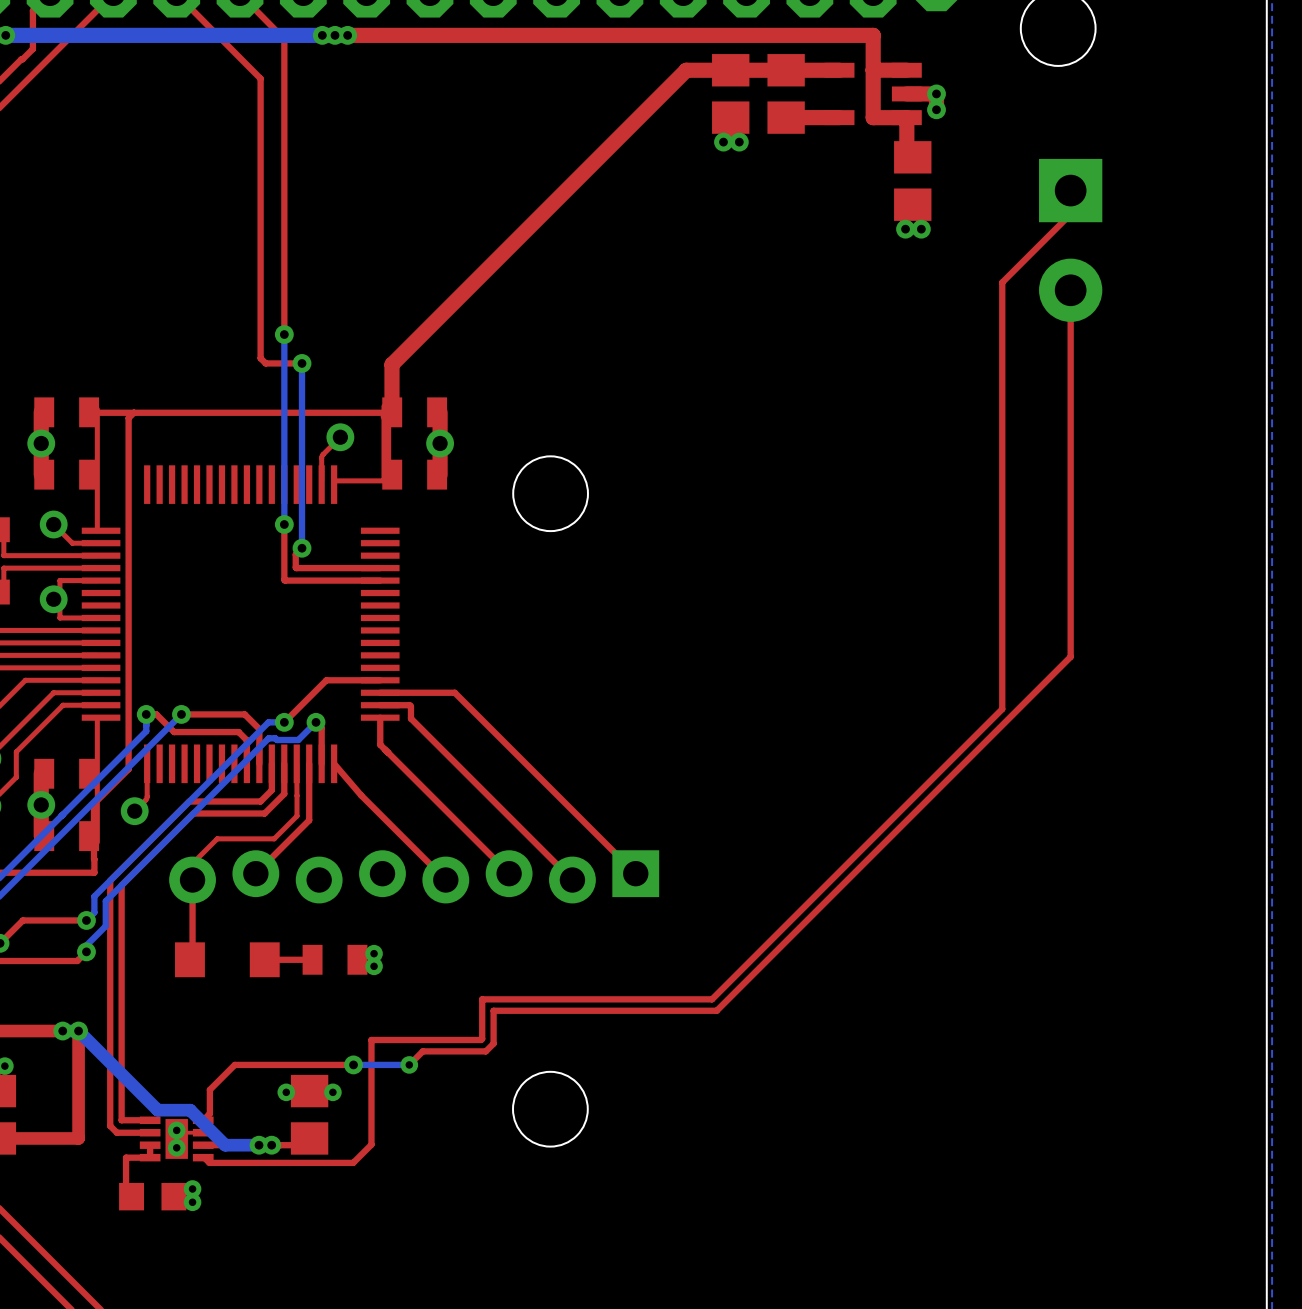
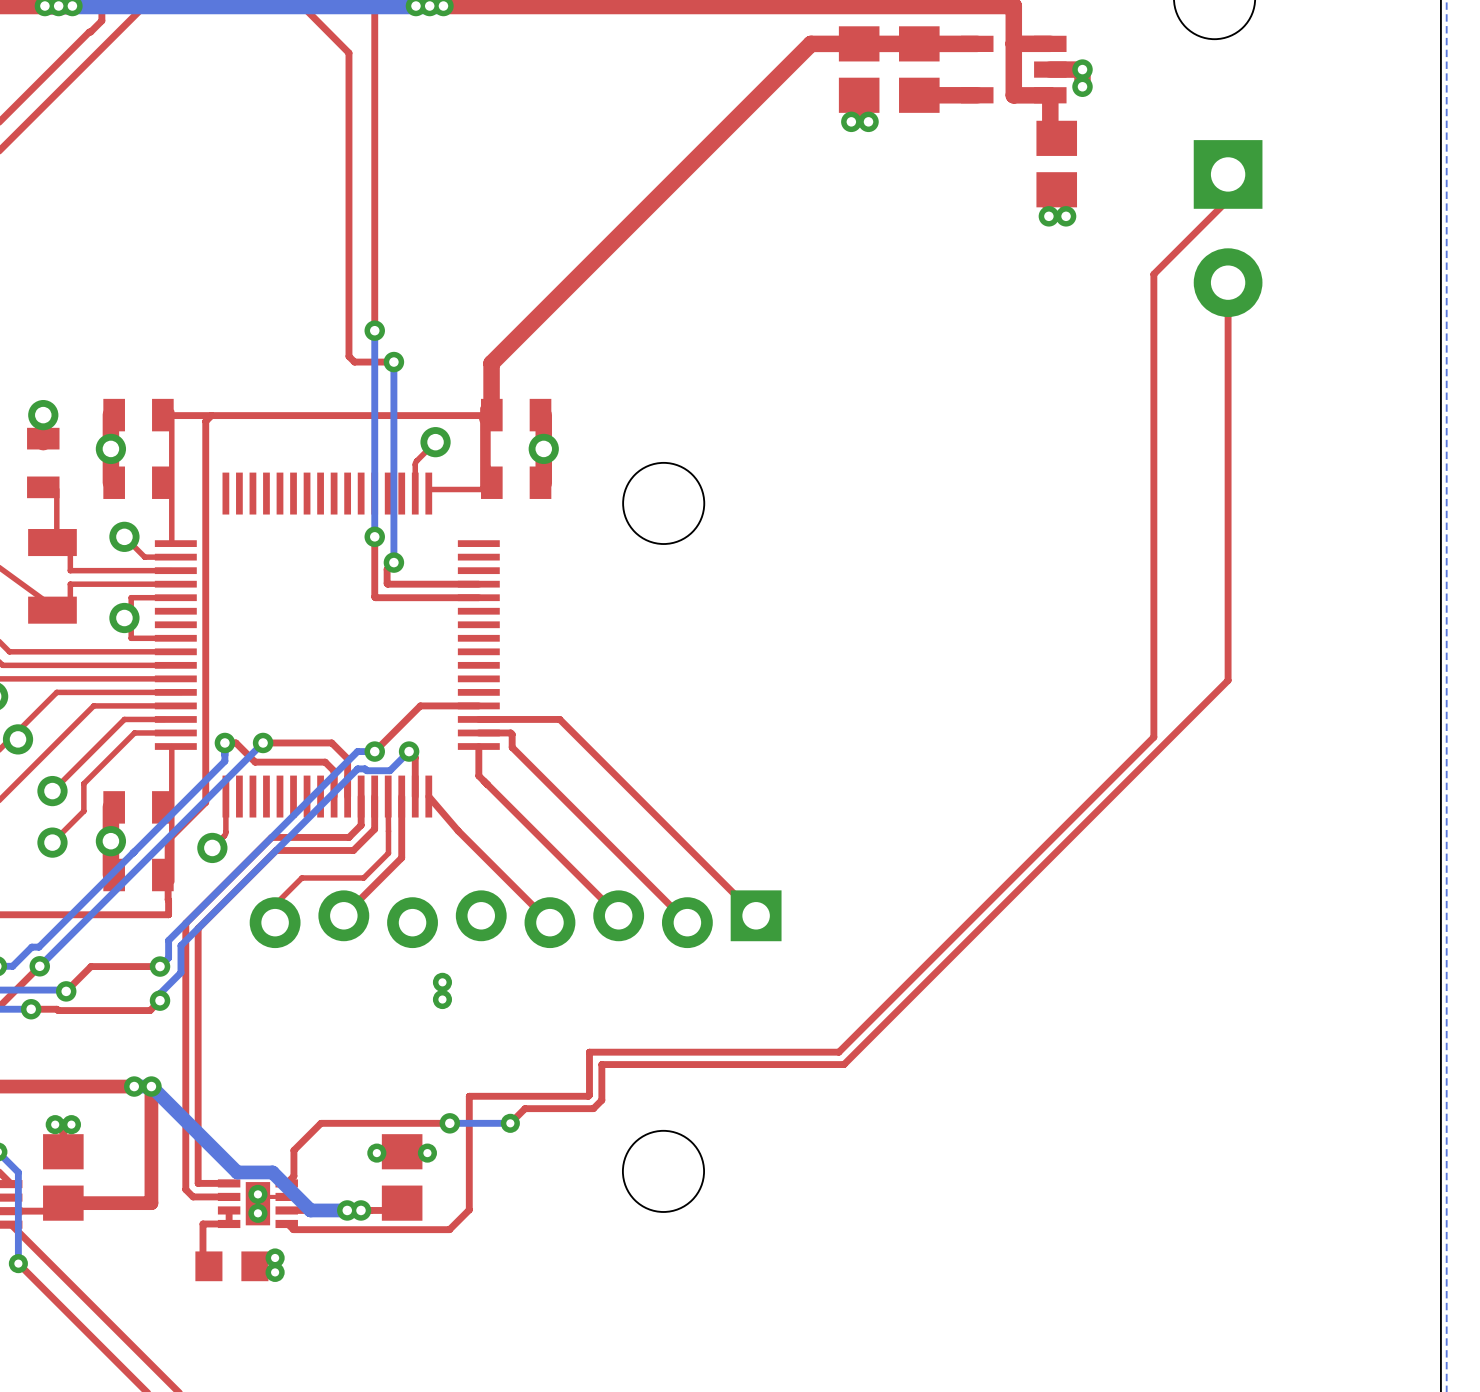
top track: (192, 880) (192, 957) (189, 959) -> none
via: none -> (442, 982)
via: none -> (442, 999)
via: (374, 953) -> none
part: (227, 959) -> none
top track: (312, 959) (264, 959) -> none
part: (335, 959) -> none
via: (374, 966) -> none

